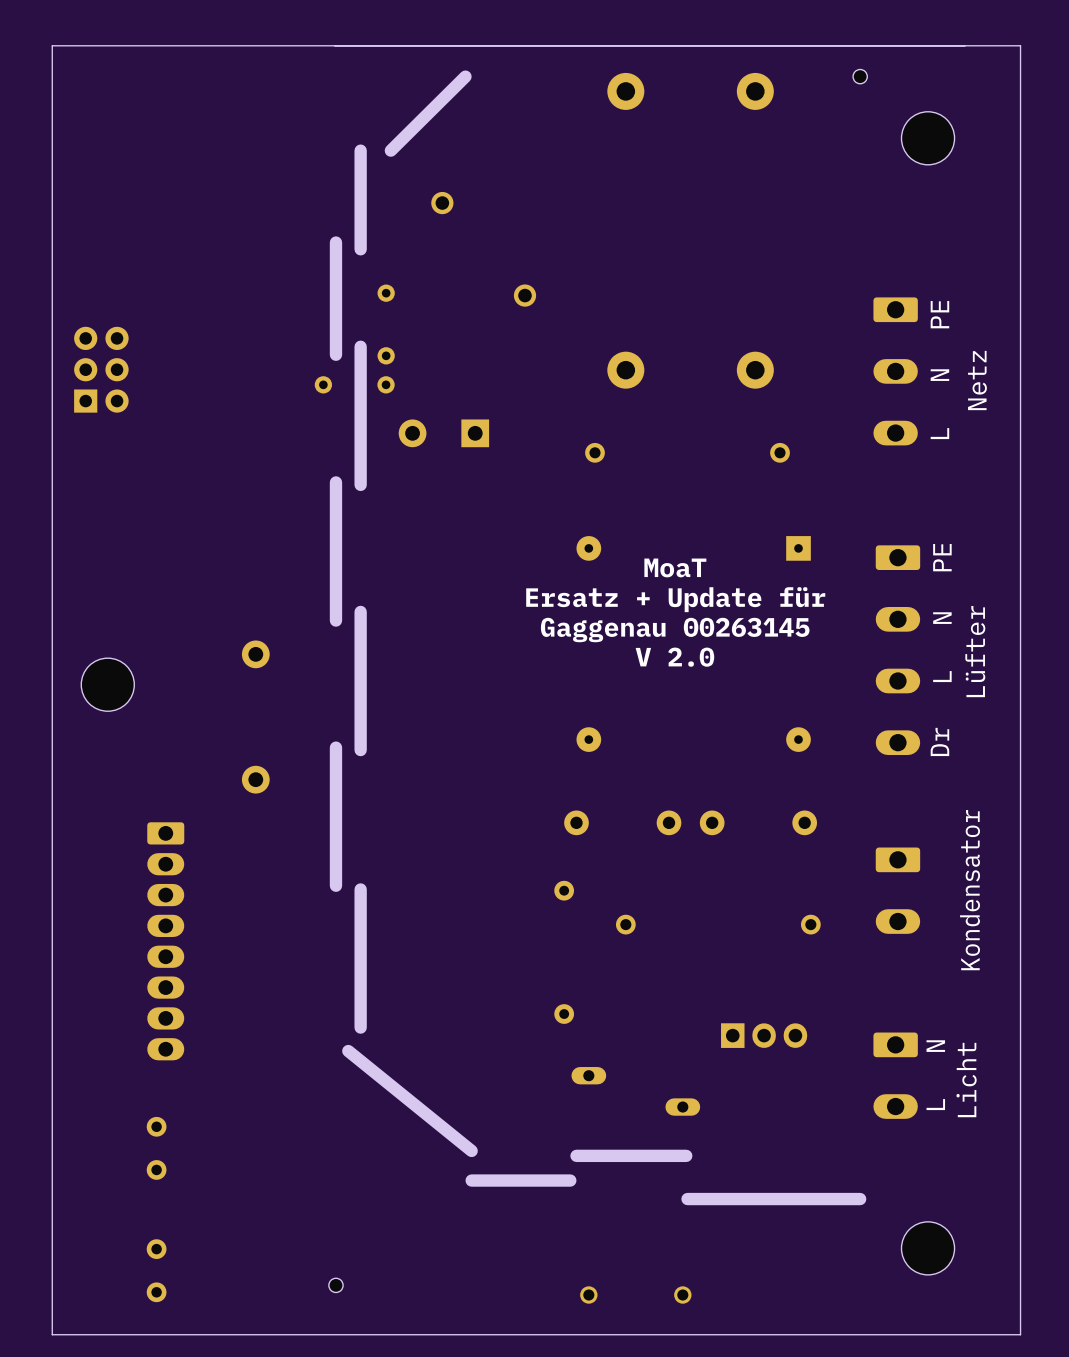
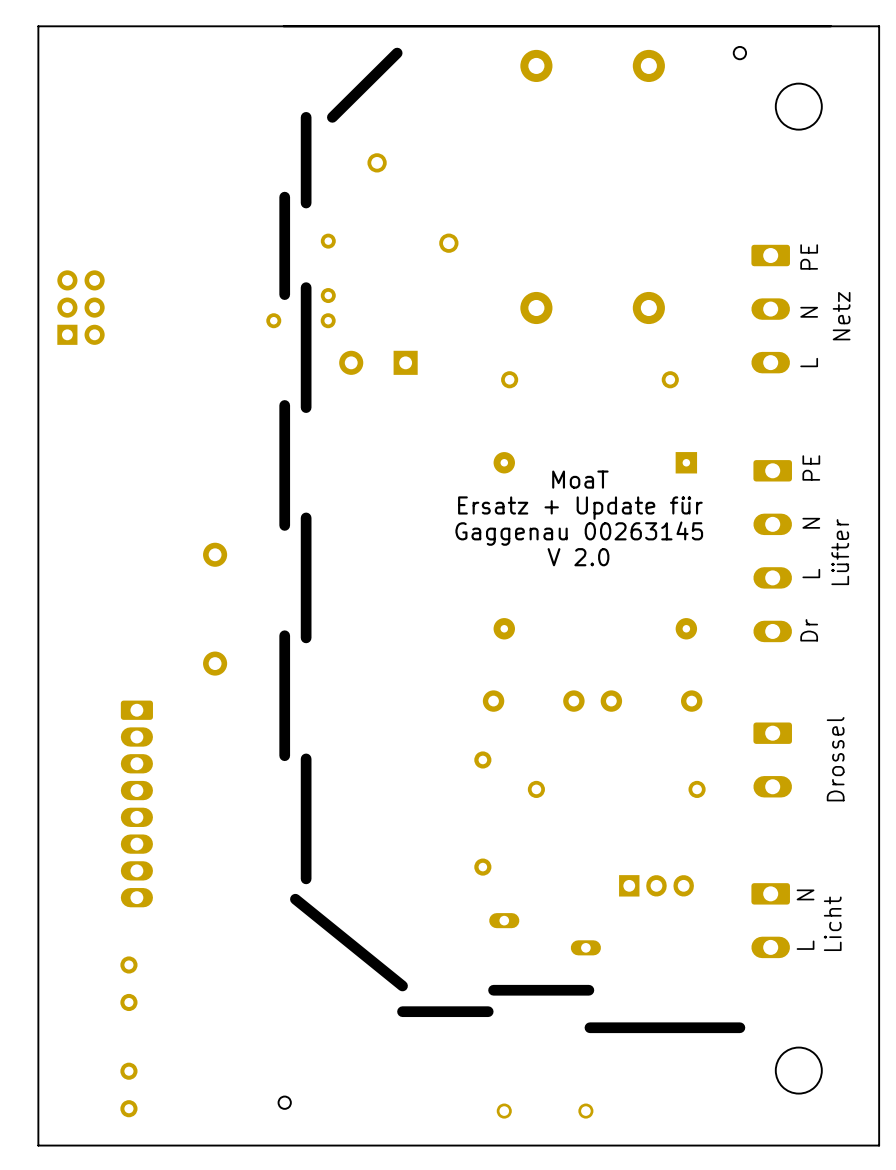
part: (107, 684) -> none
text: Kondensator (970, 890) -> Drossel (835, 759)

